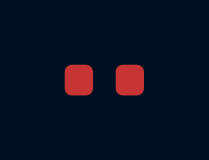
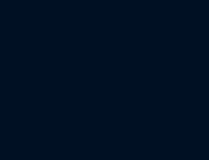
part: (104, 80) -> none

